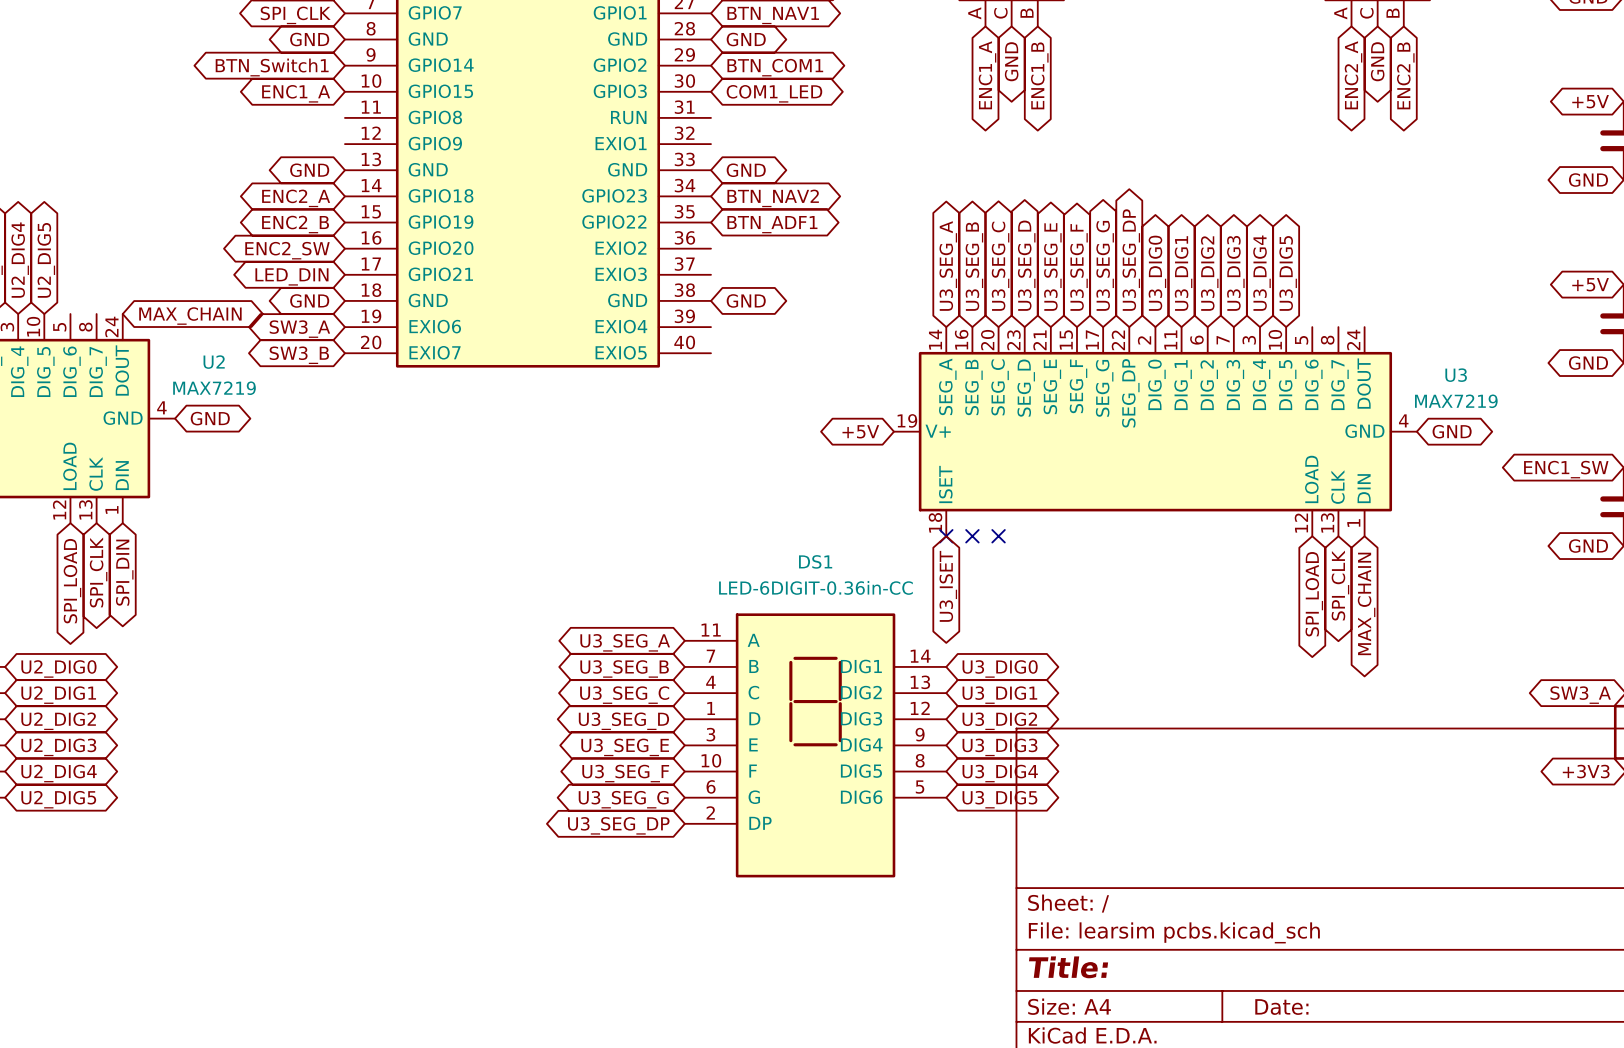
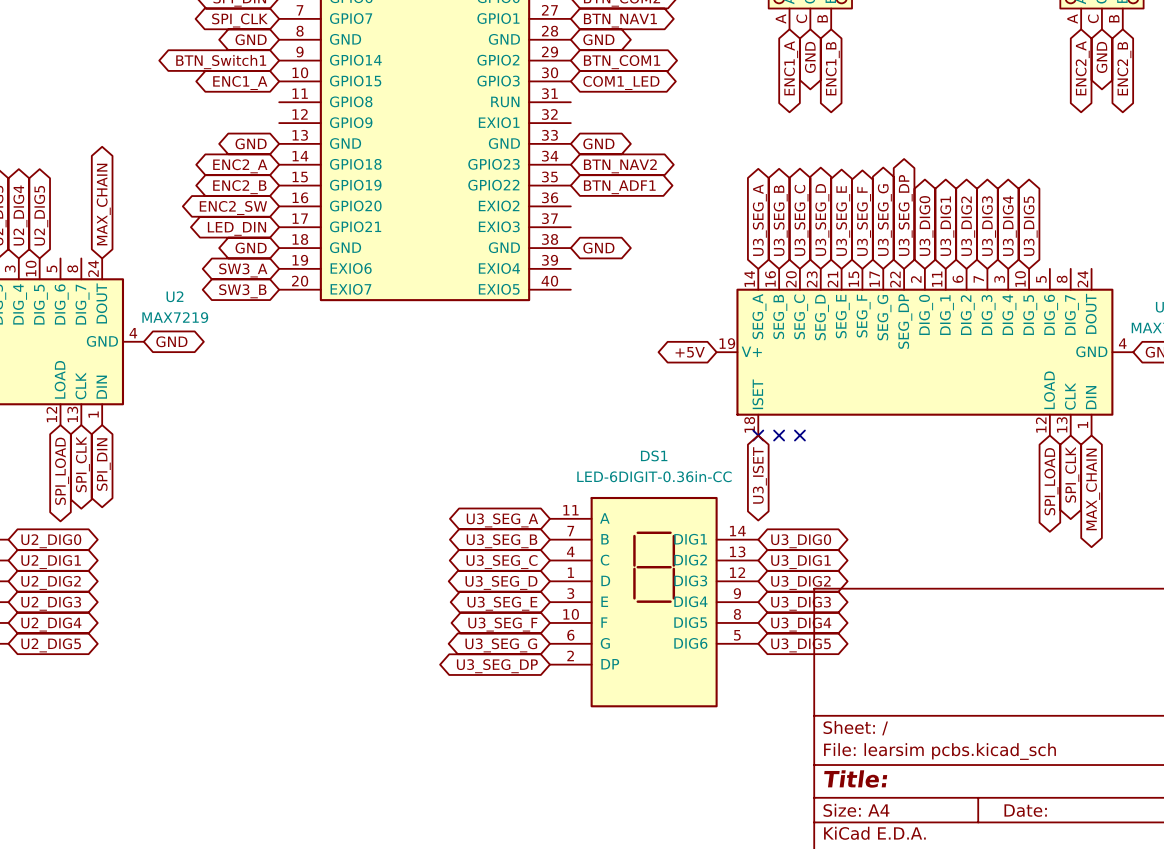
global label rotation: 0° (190, 316) -> 90° counterclockwise (103, 204)

